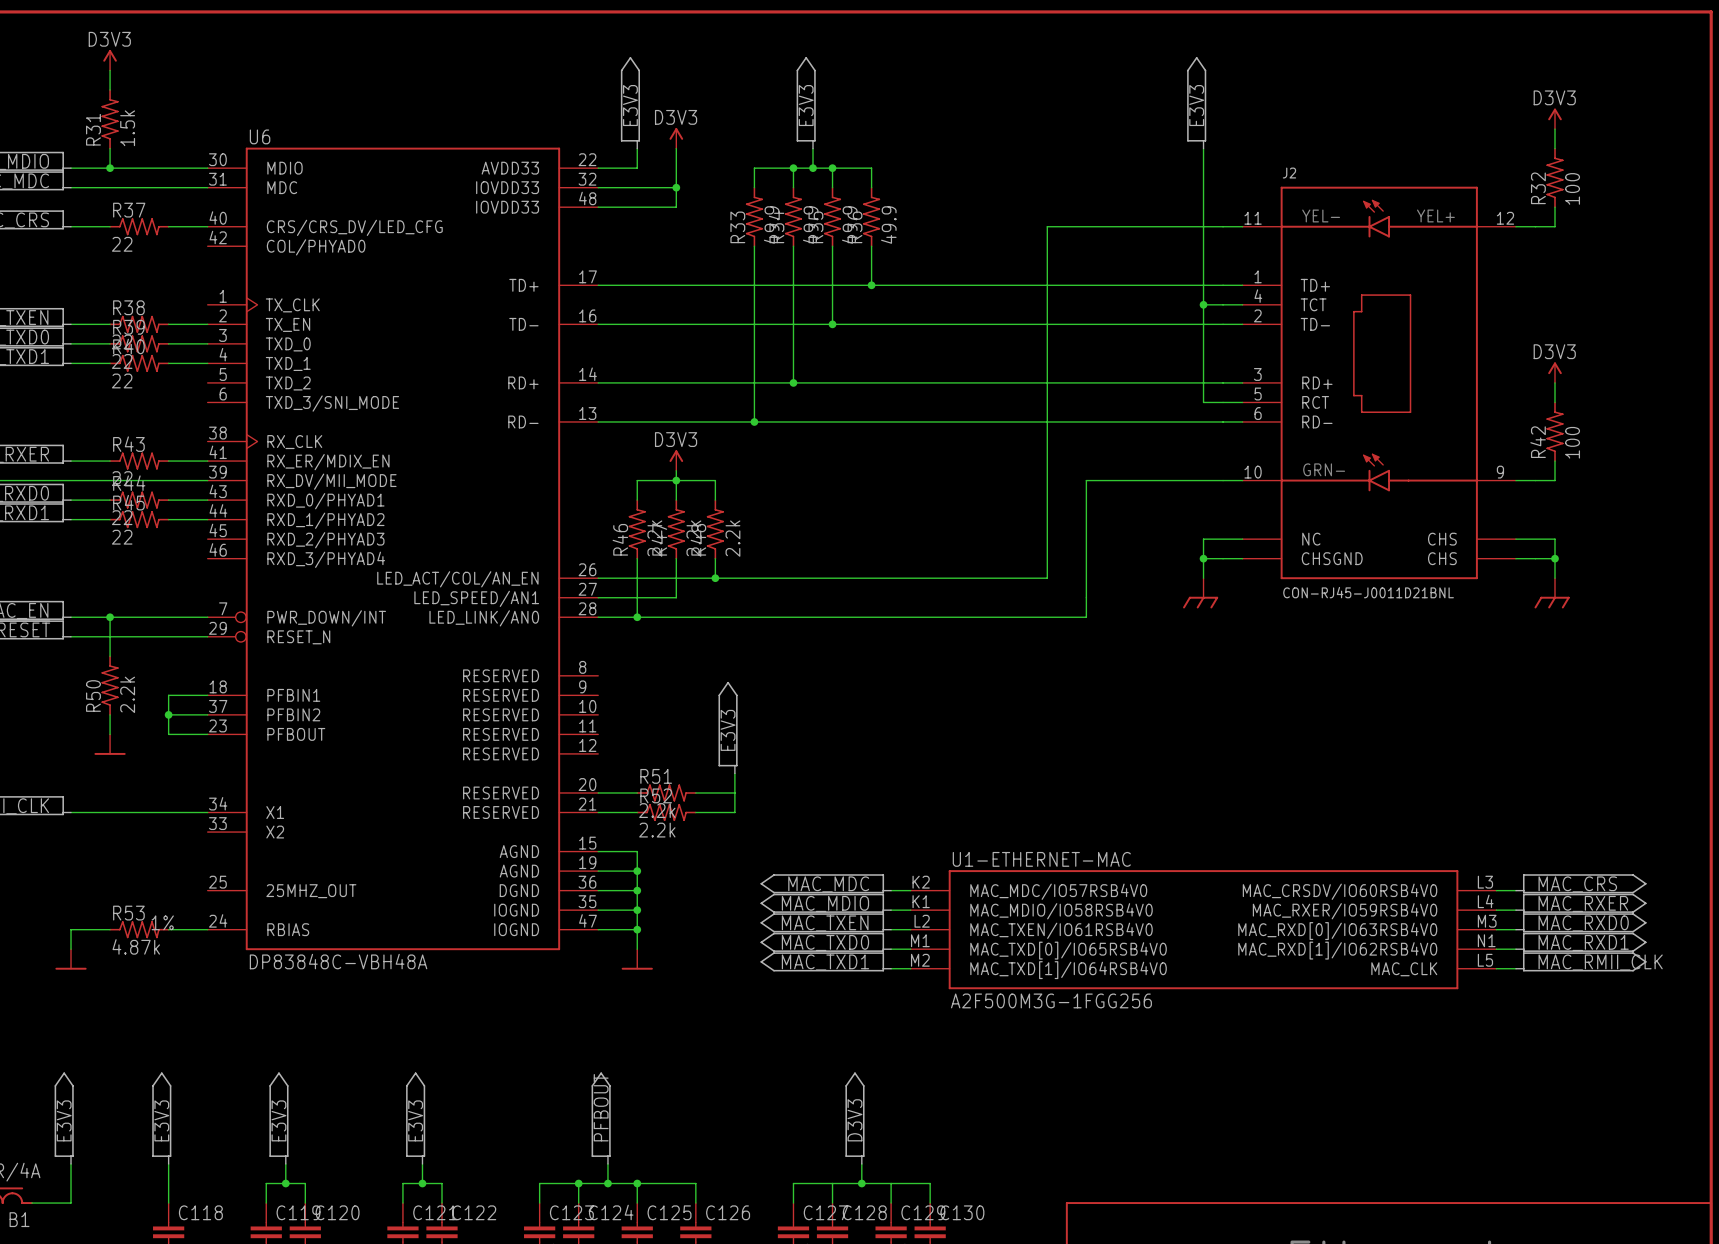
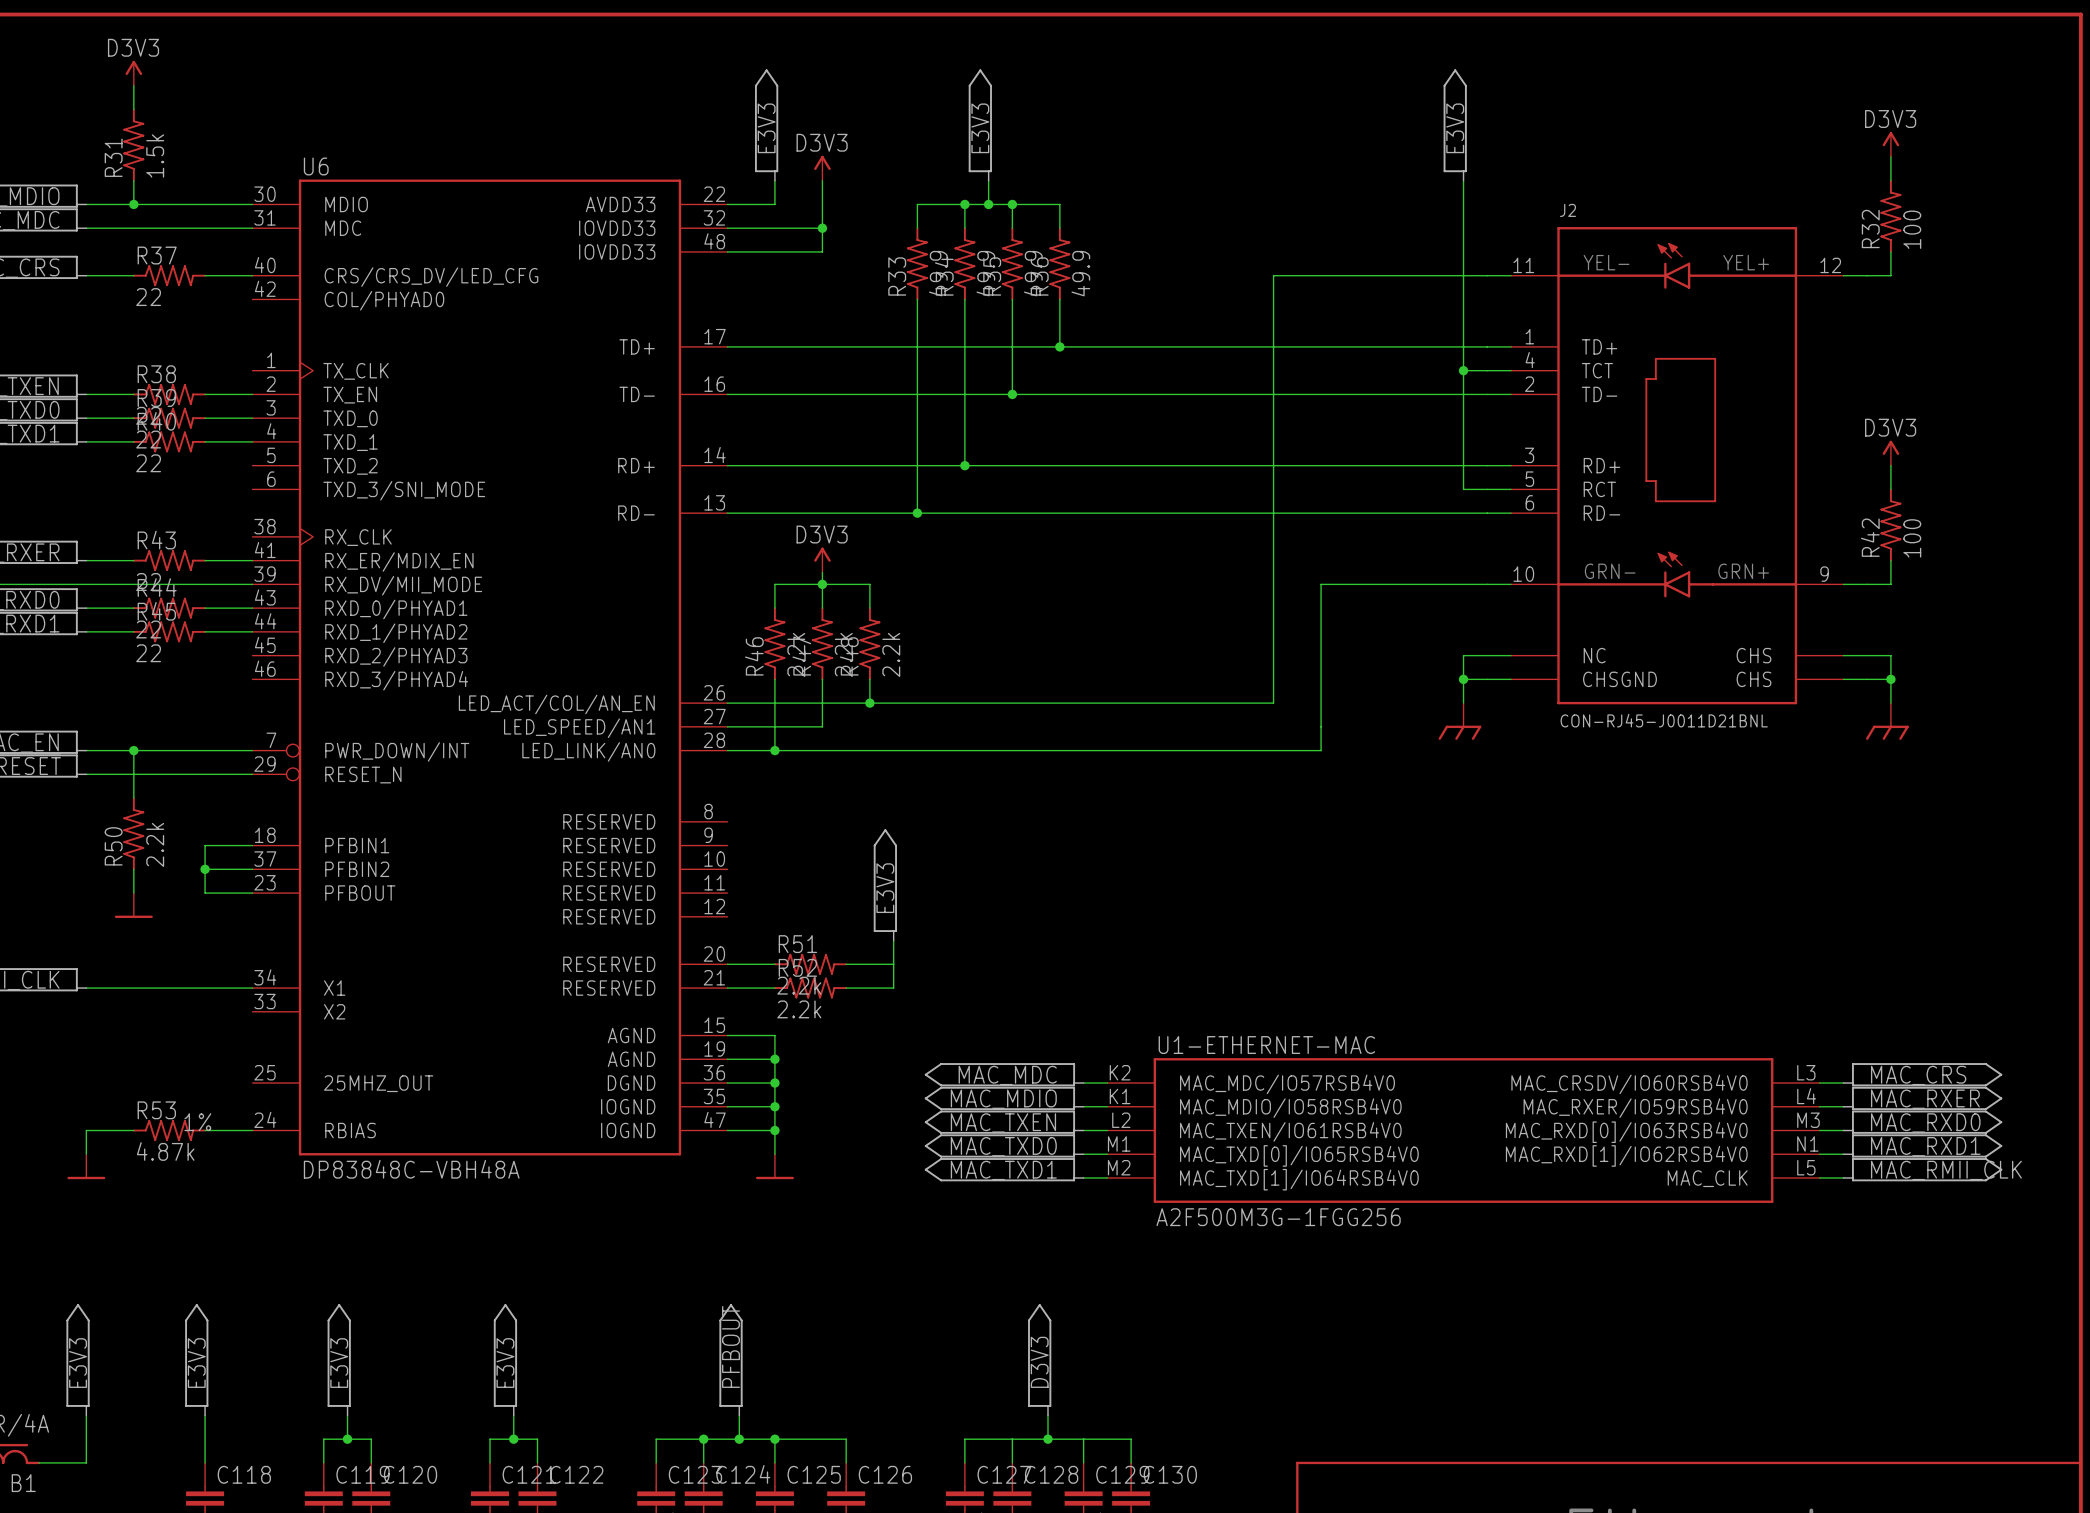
J2 text: none -> GRN+ (1743, 571)

